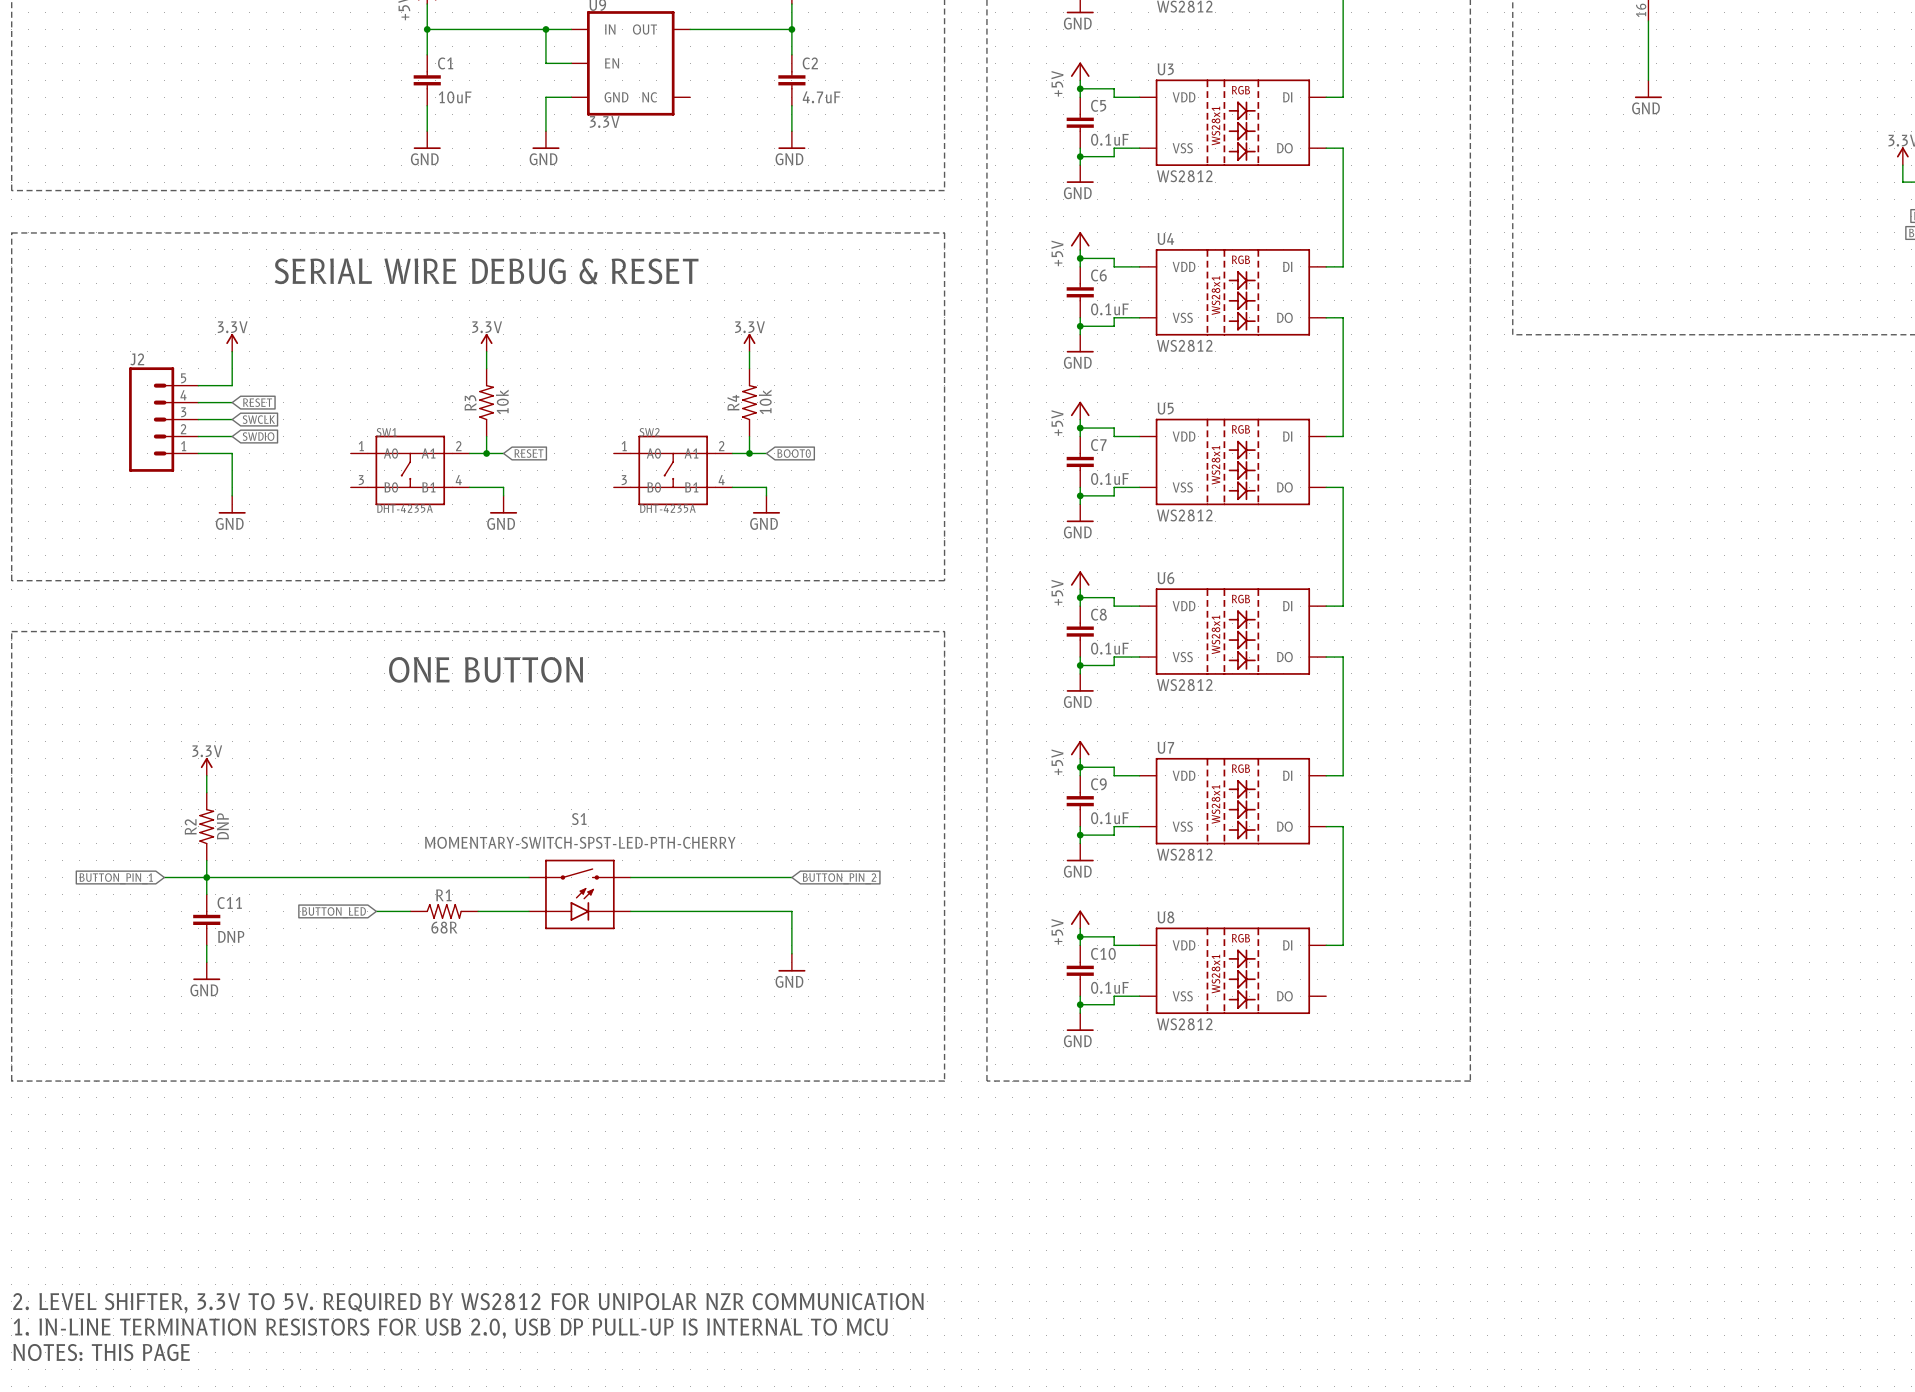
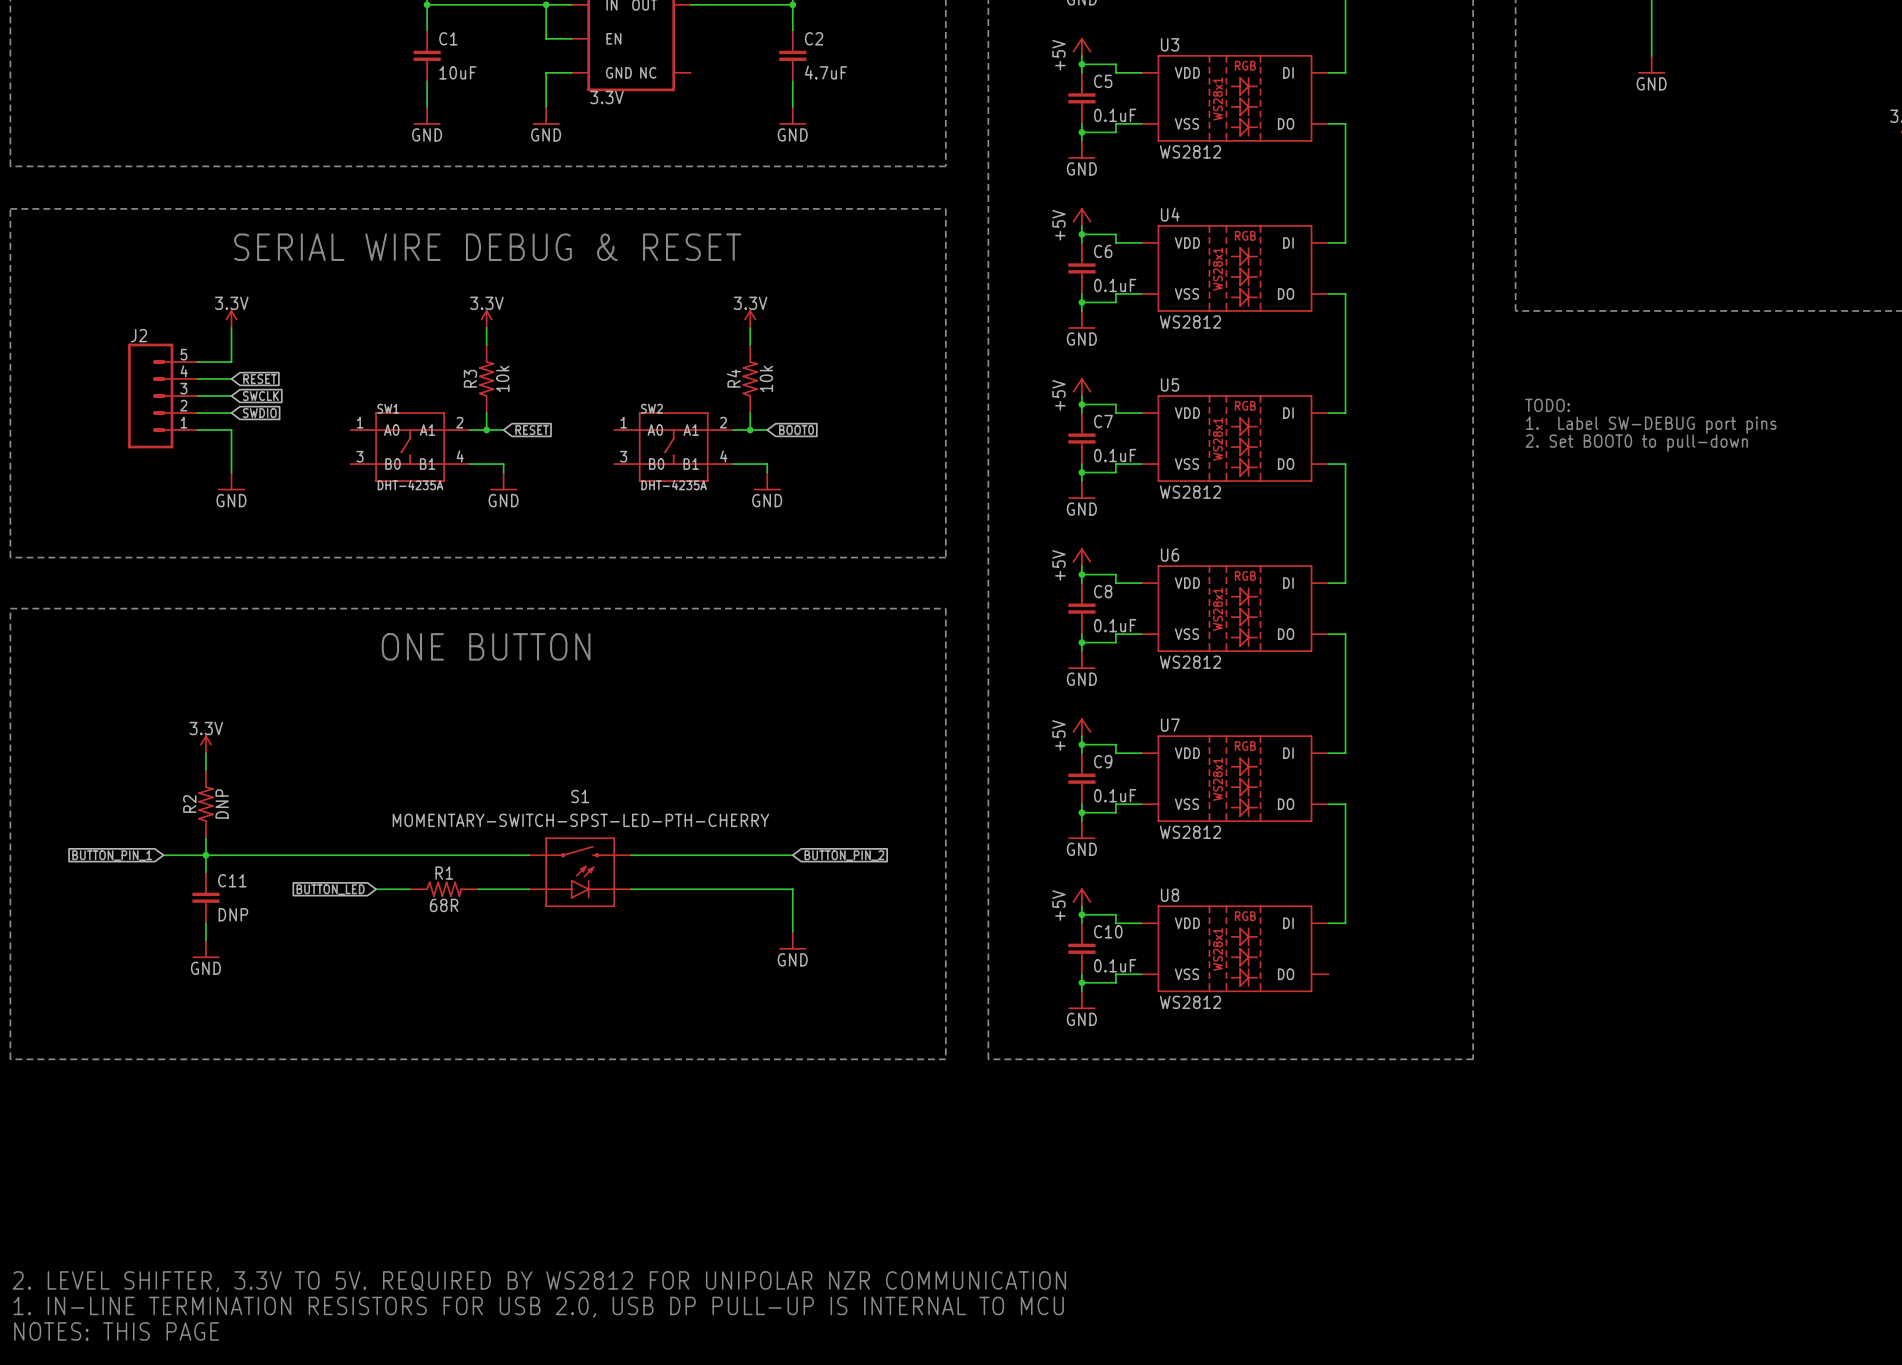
text: none -> TODO: (1547, 405)
text: none -> 1. Label SW-DEBUG port pins (1651, 425)
text: none -> 2. Set BOOT0 to pull-down (1636, 443)

